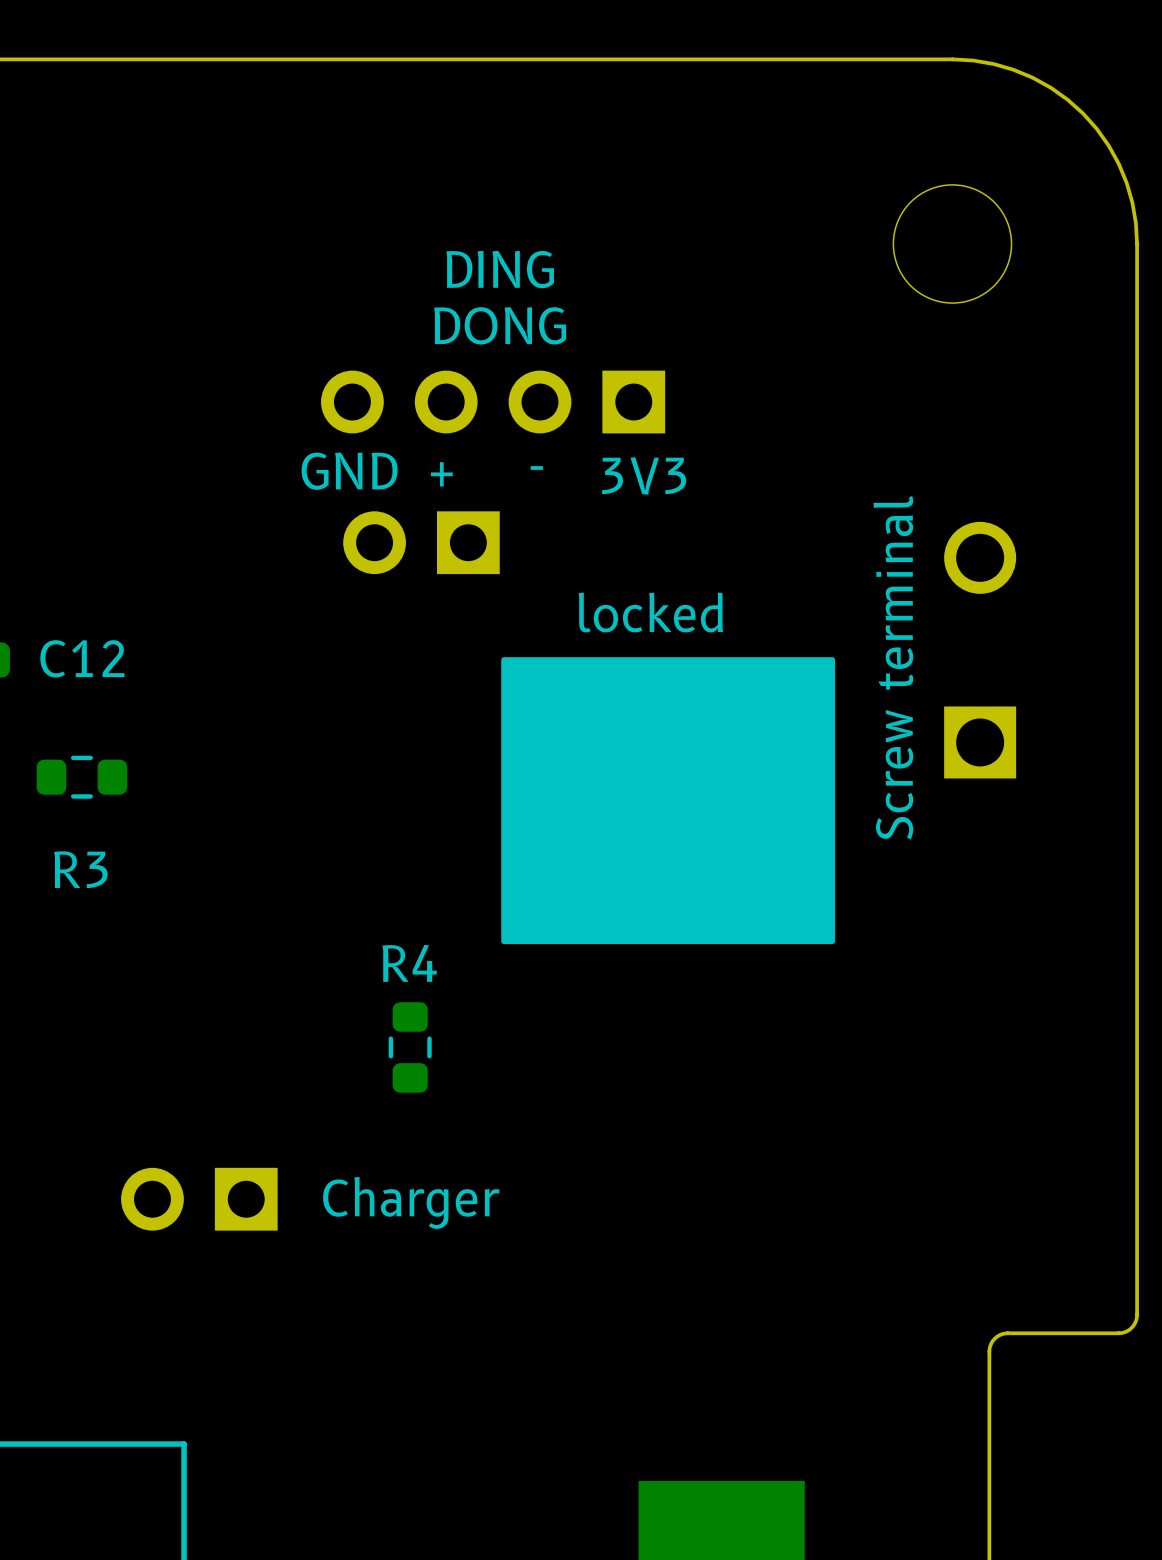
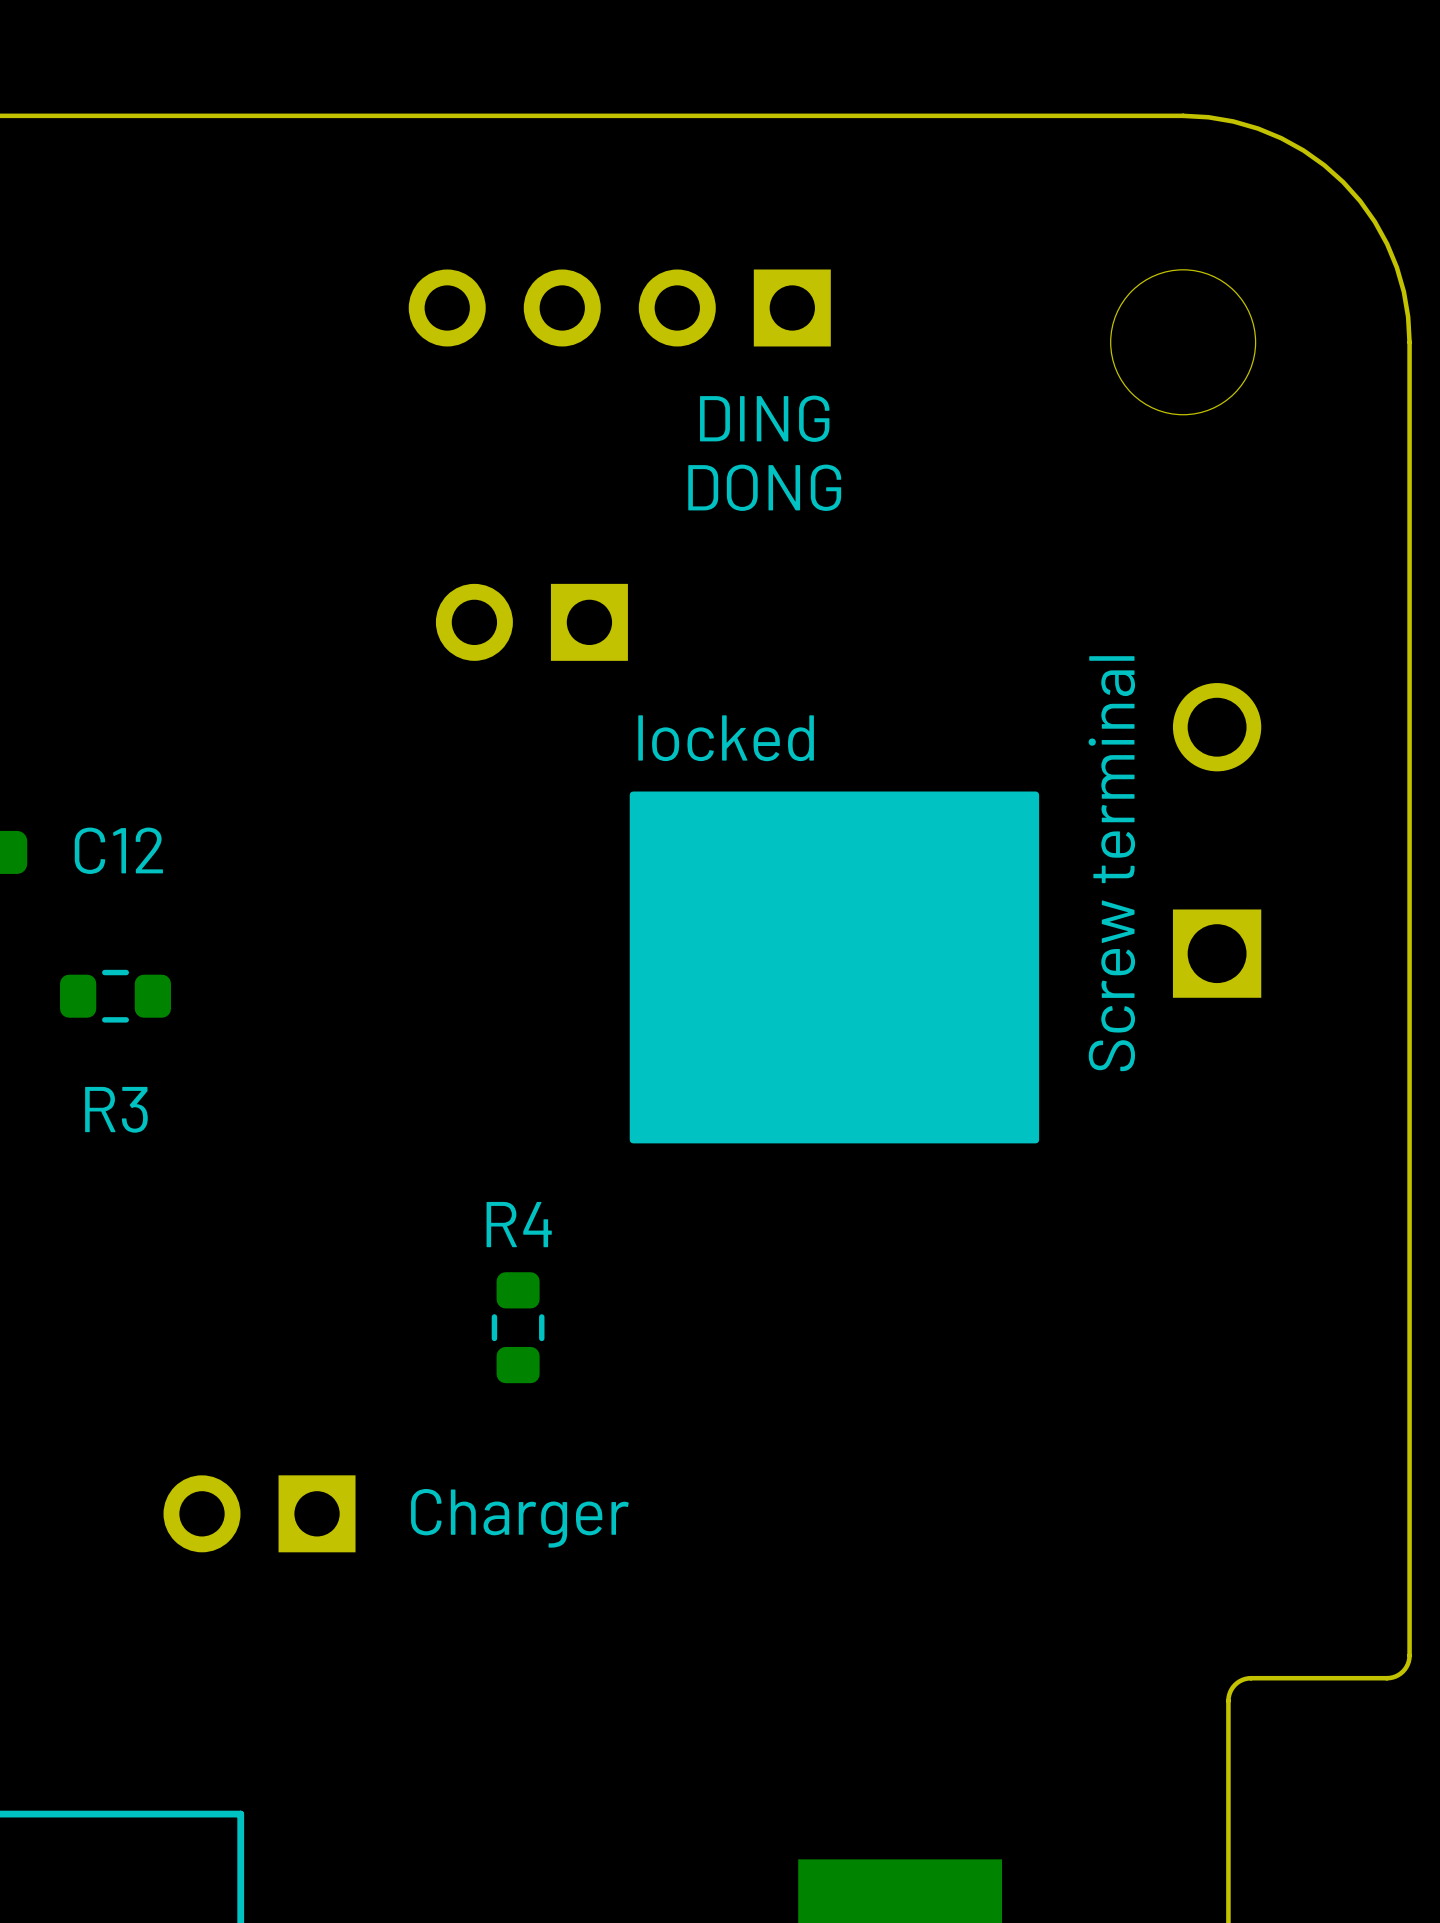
part: none -> (619, 307)
part: (493, 402) -> none
part position: (421, 542) -> (531, 622)
text position: locked (650, 612) -> locked (726, 738)
drawing position: (668, 800) -> (834, 967)

